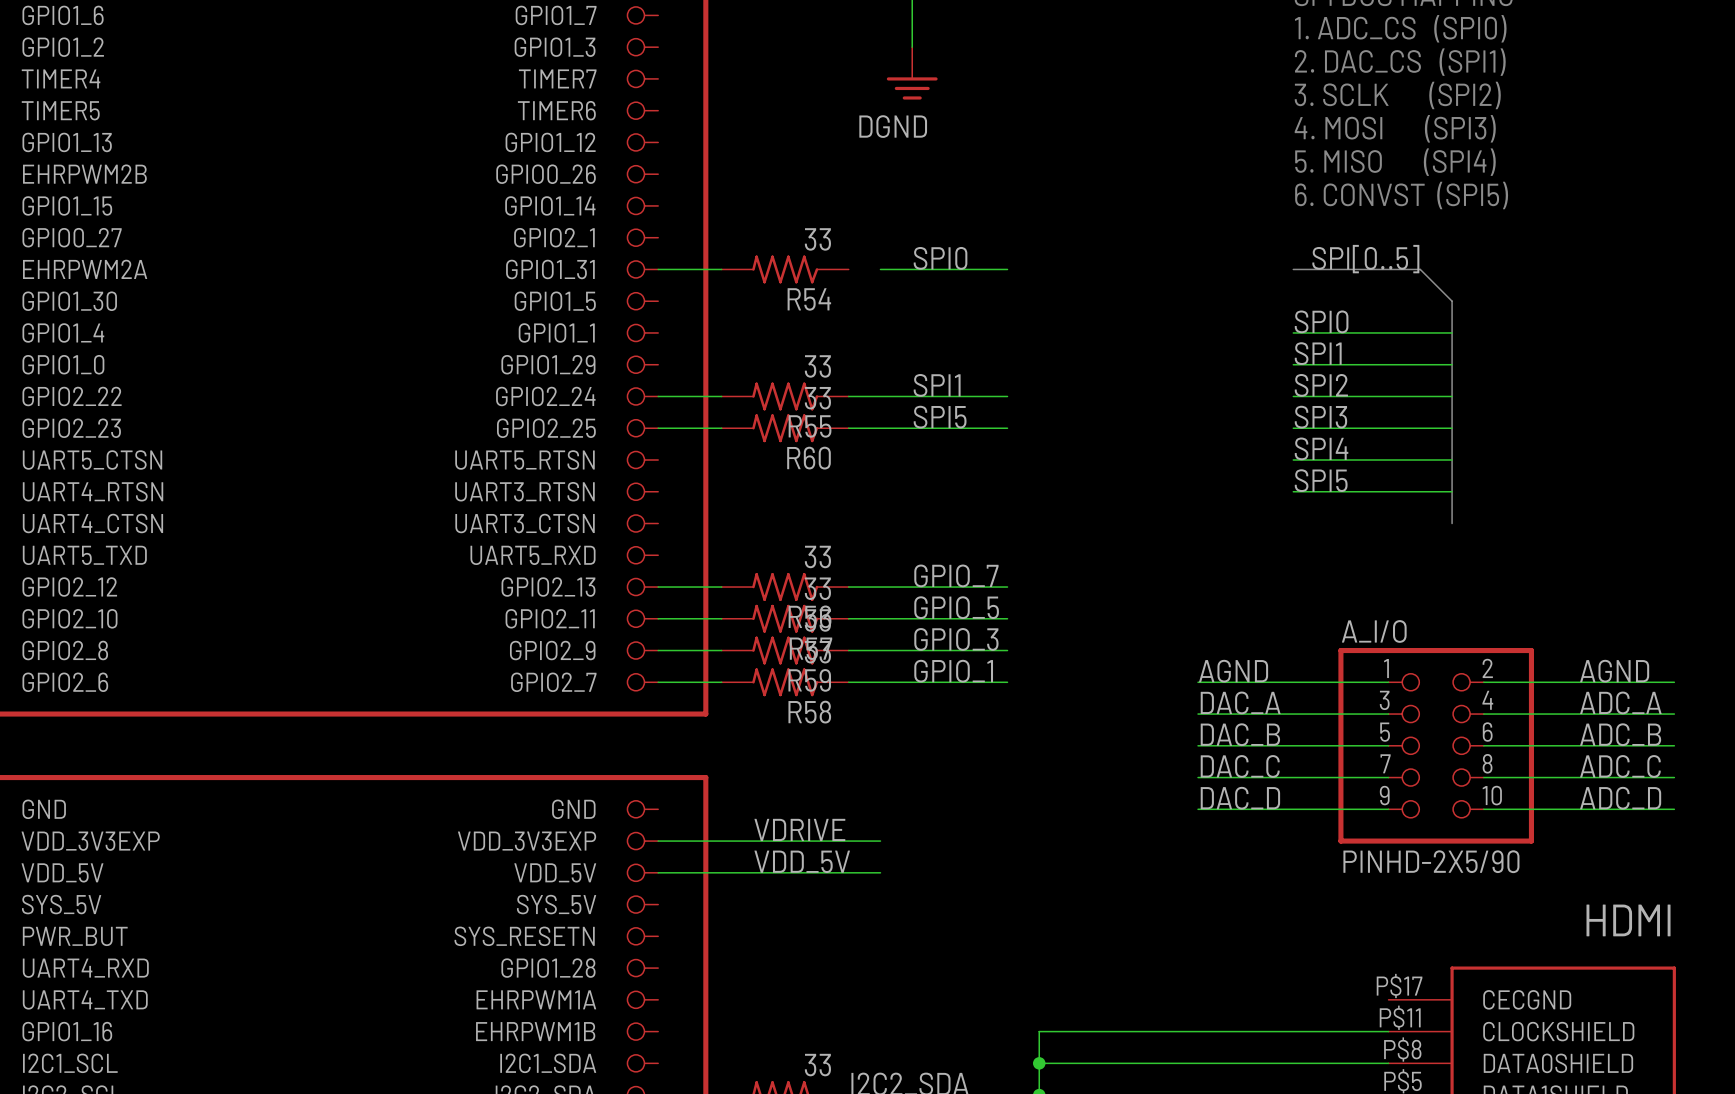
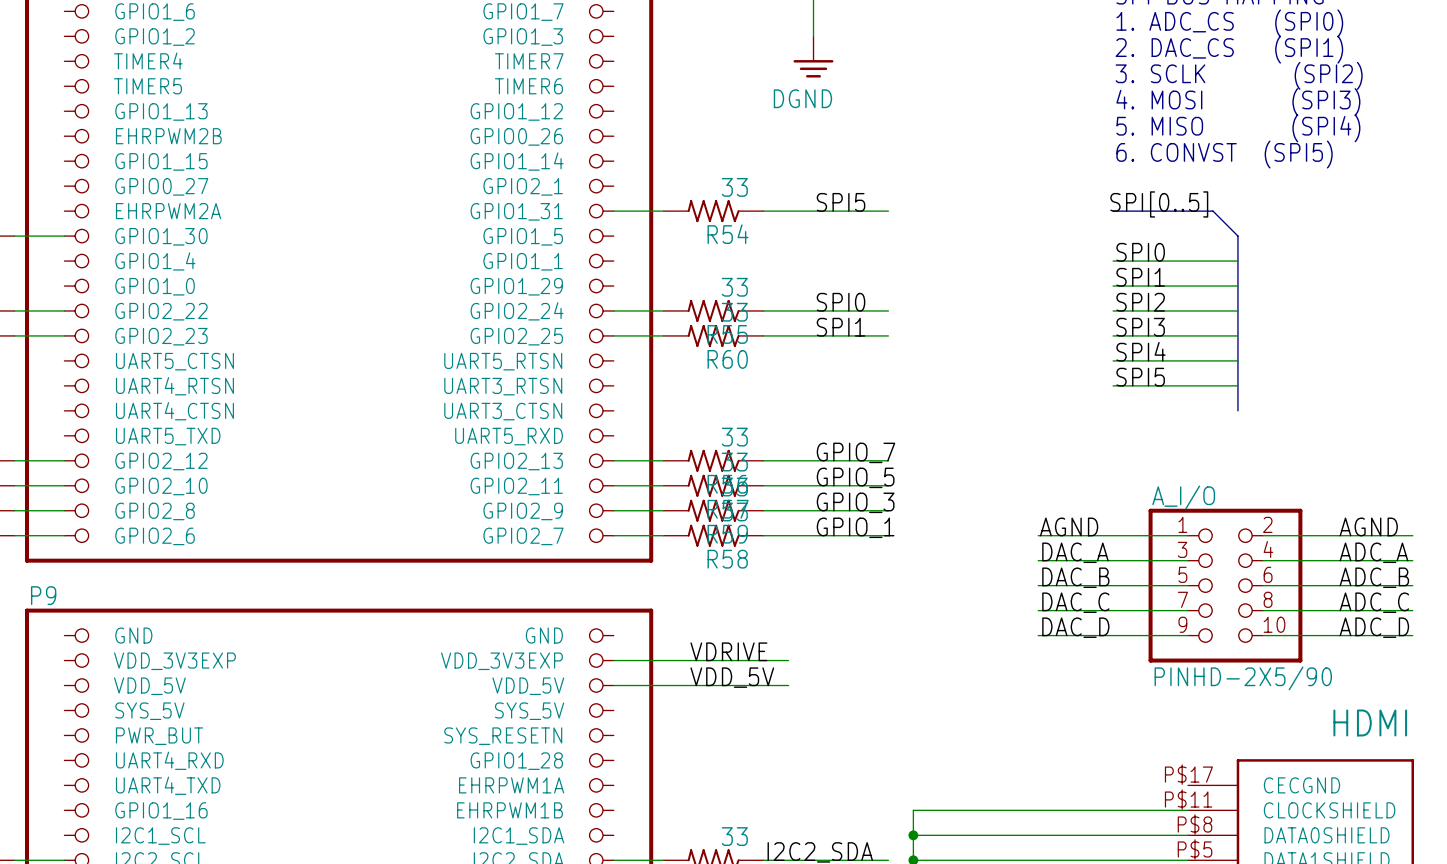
label: SPI0 (940, 258) -> SPI5 (841, 202)
wire: none -> (763, 211) (788, 211)
label: SPI1 (937, 385) -> SPI0 (841, 302)
label: SPI5 (940, 417) -> SPI1 (841, 327)

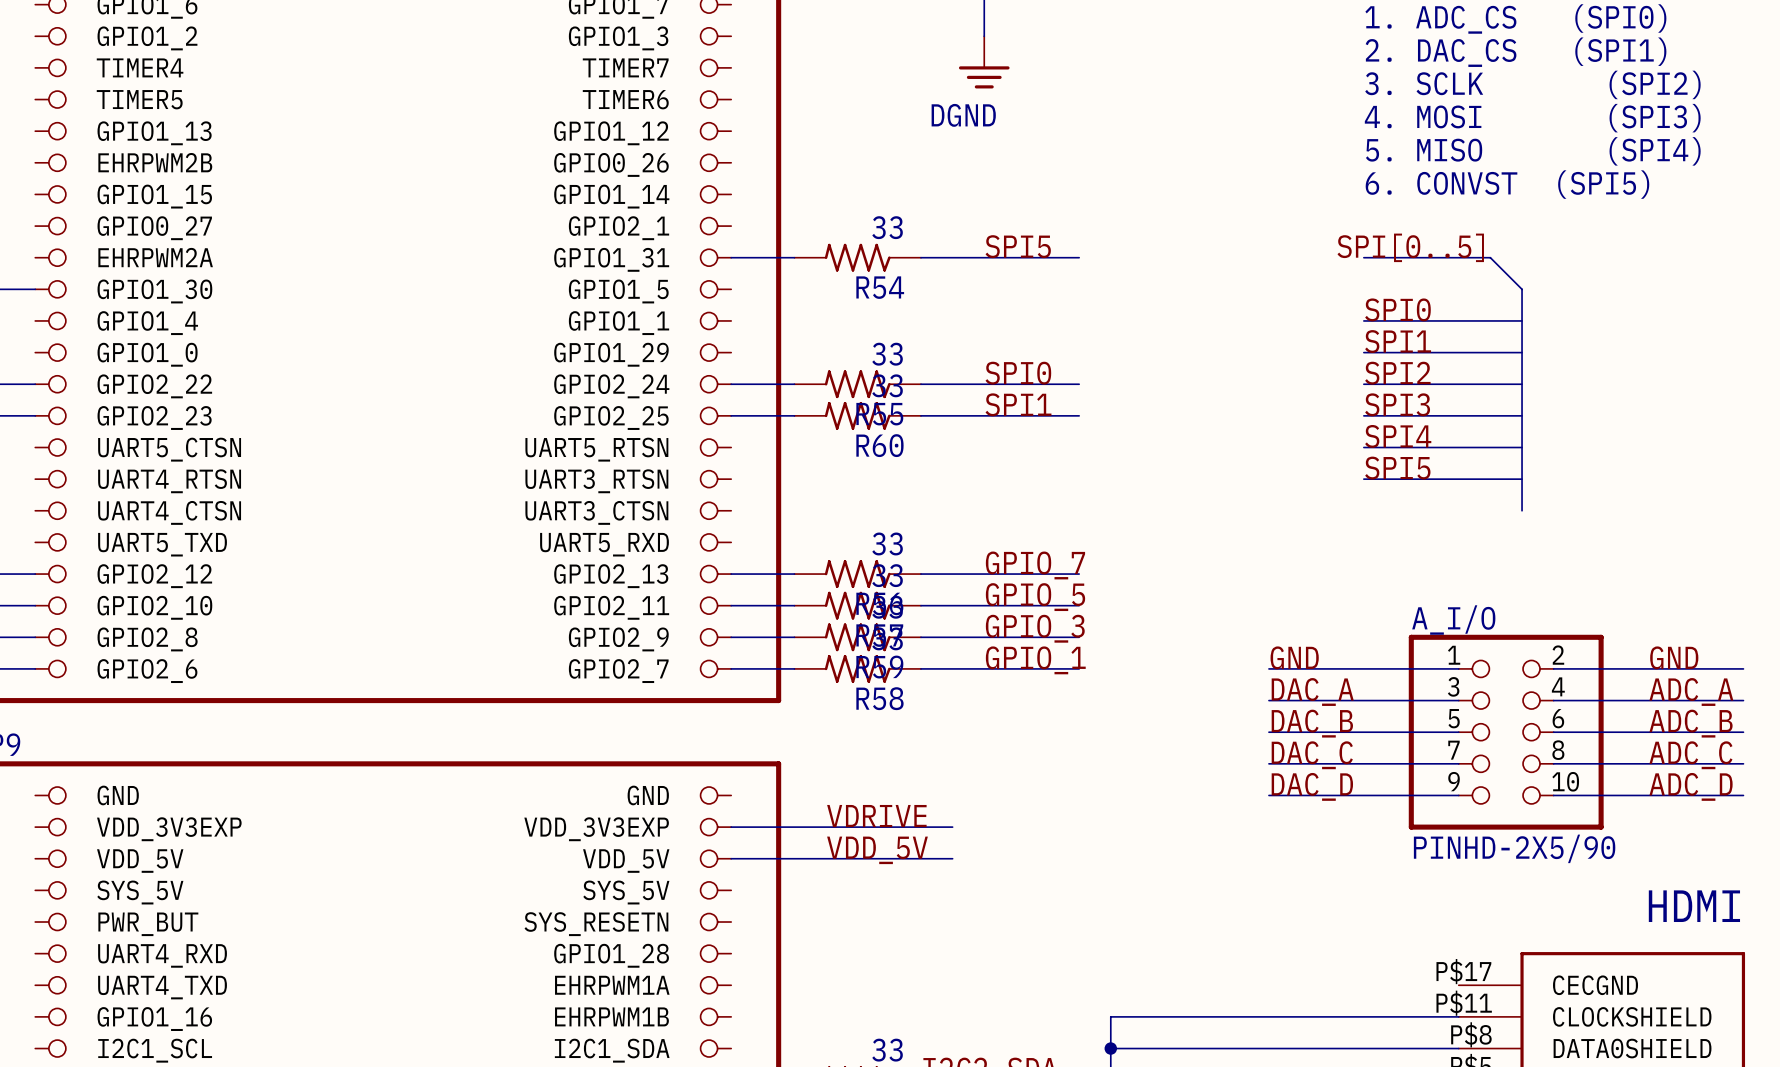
label: AGND (1069, 526) -> GND (1294, 657)
label: AGND (1368, 526) -> GND (1674, 657)

